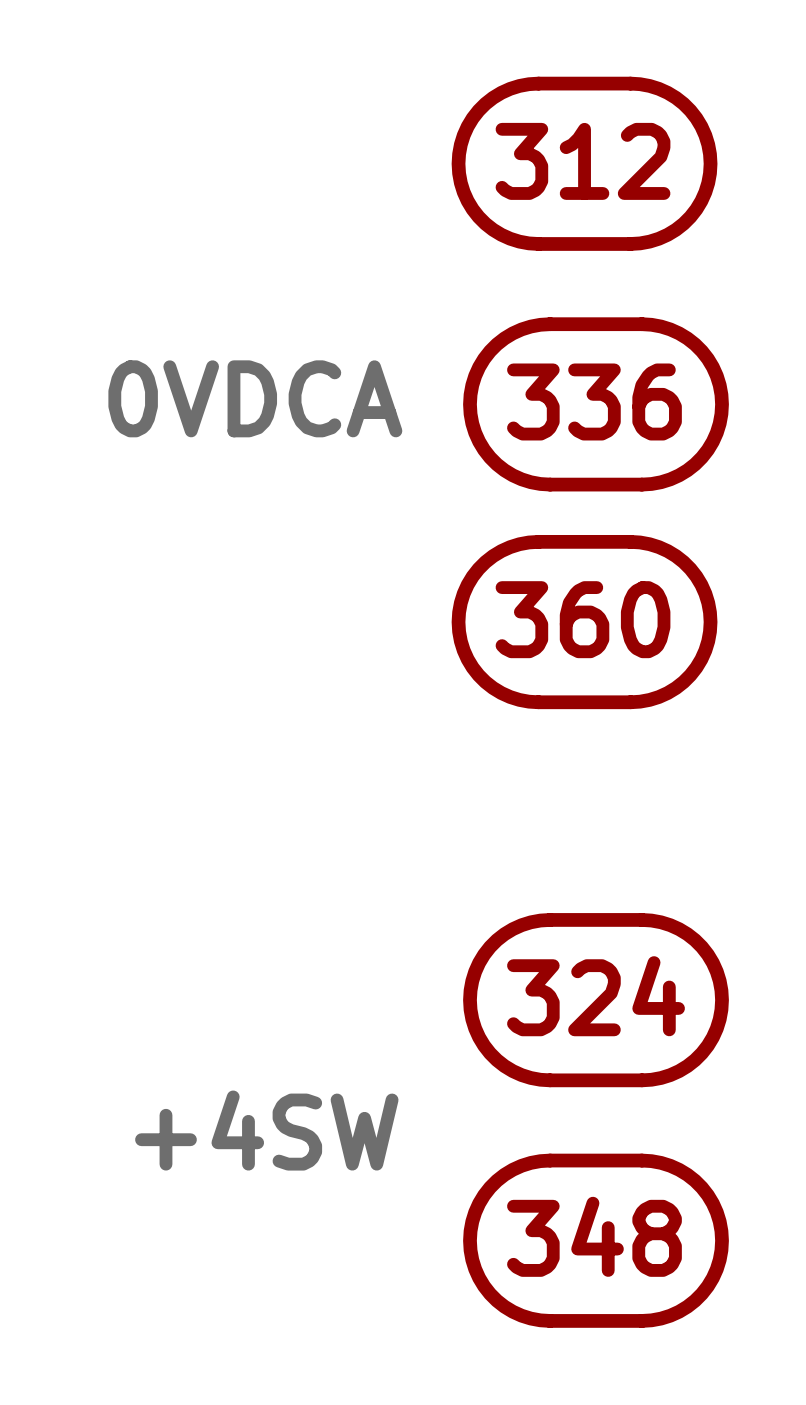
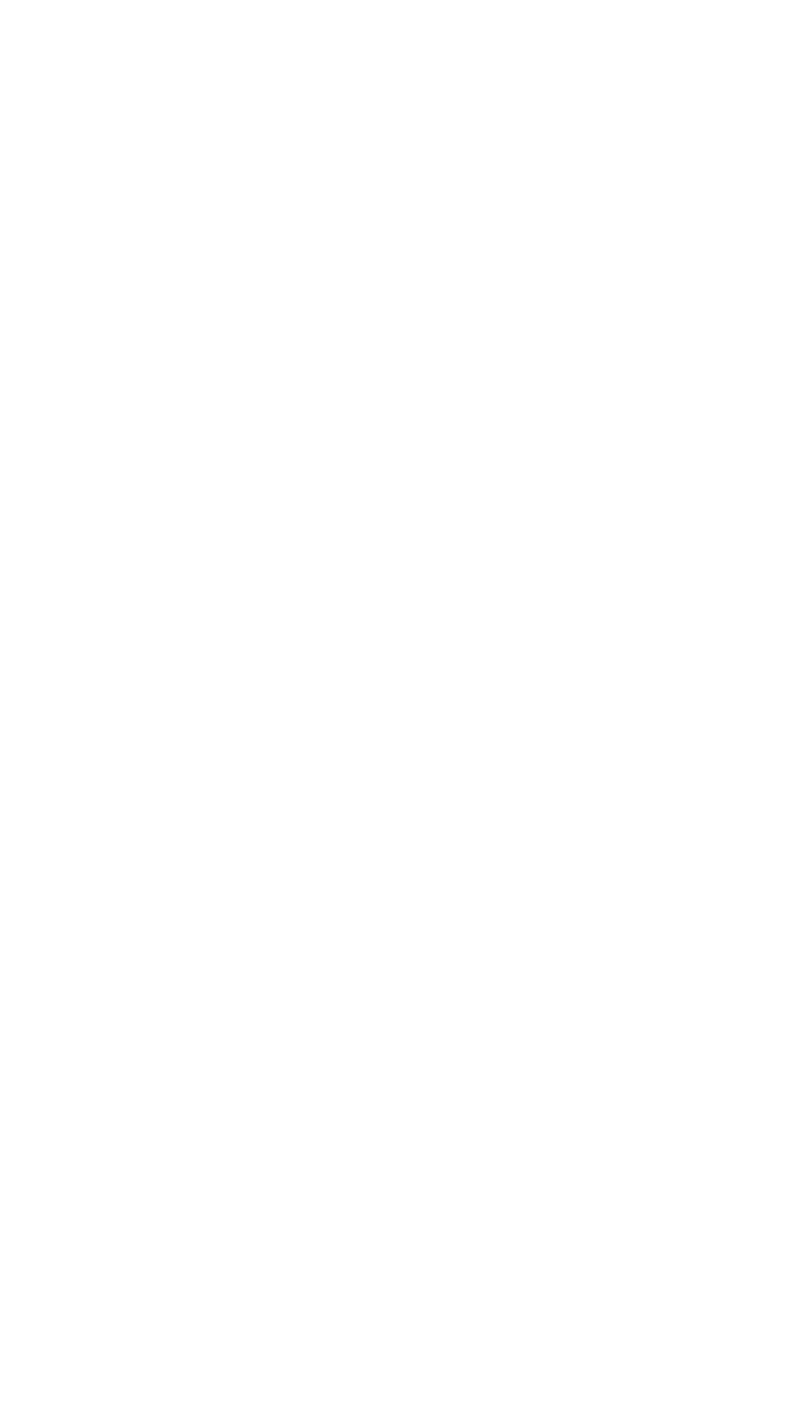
part: (584, 163) -> none
part: (596, 404) -> none
part: (584, 622) -> none
part: (596, 1000) -> none
part: (596, 1240) -> none

